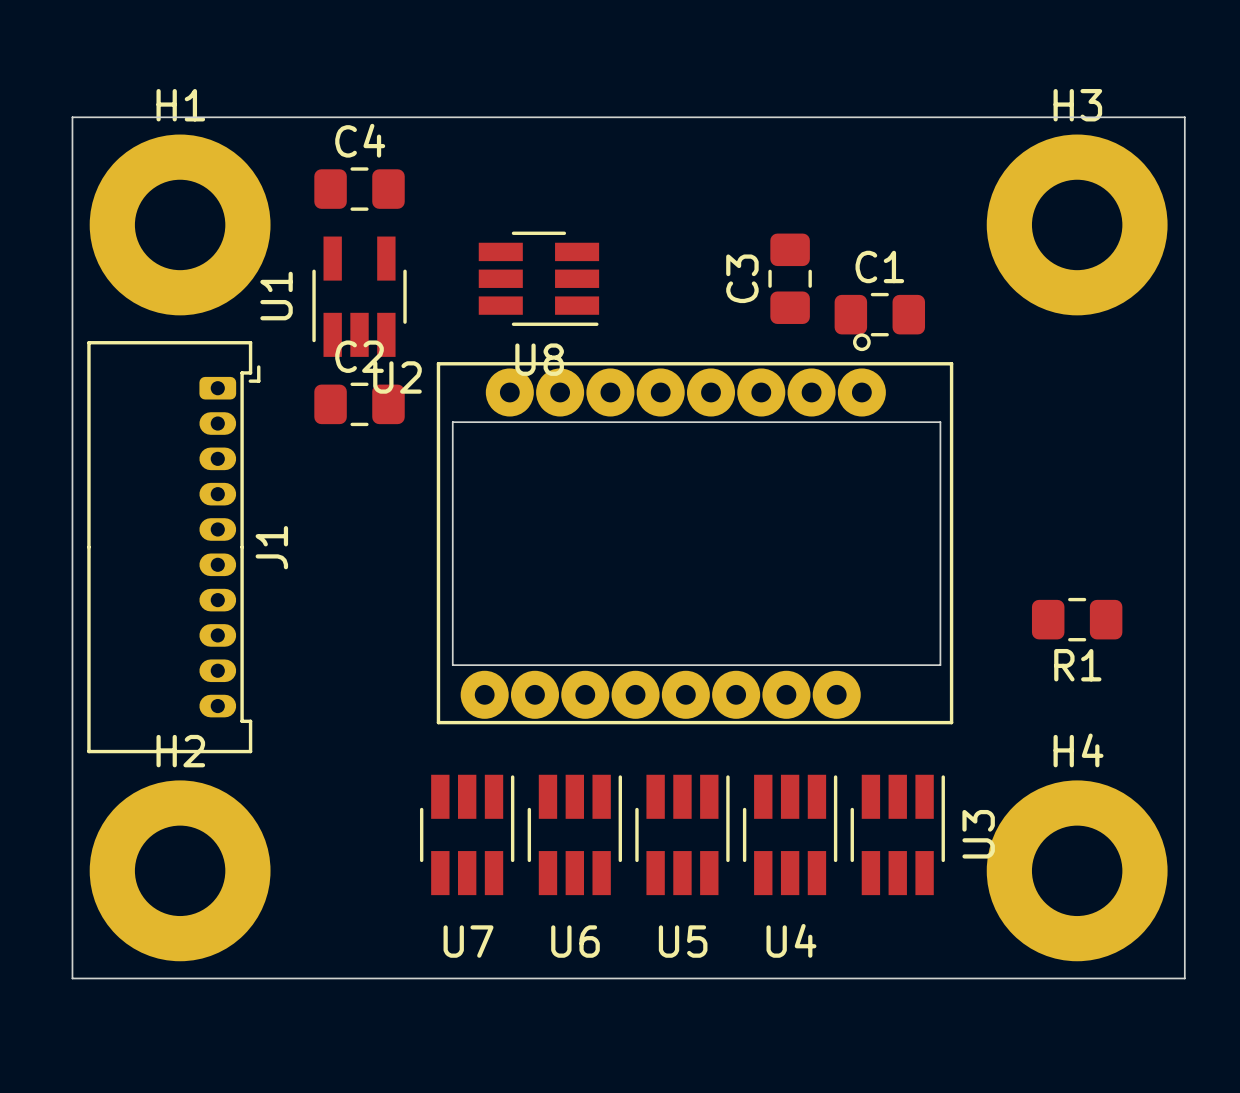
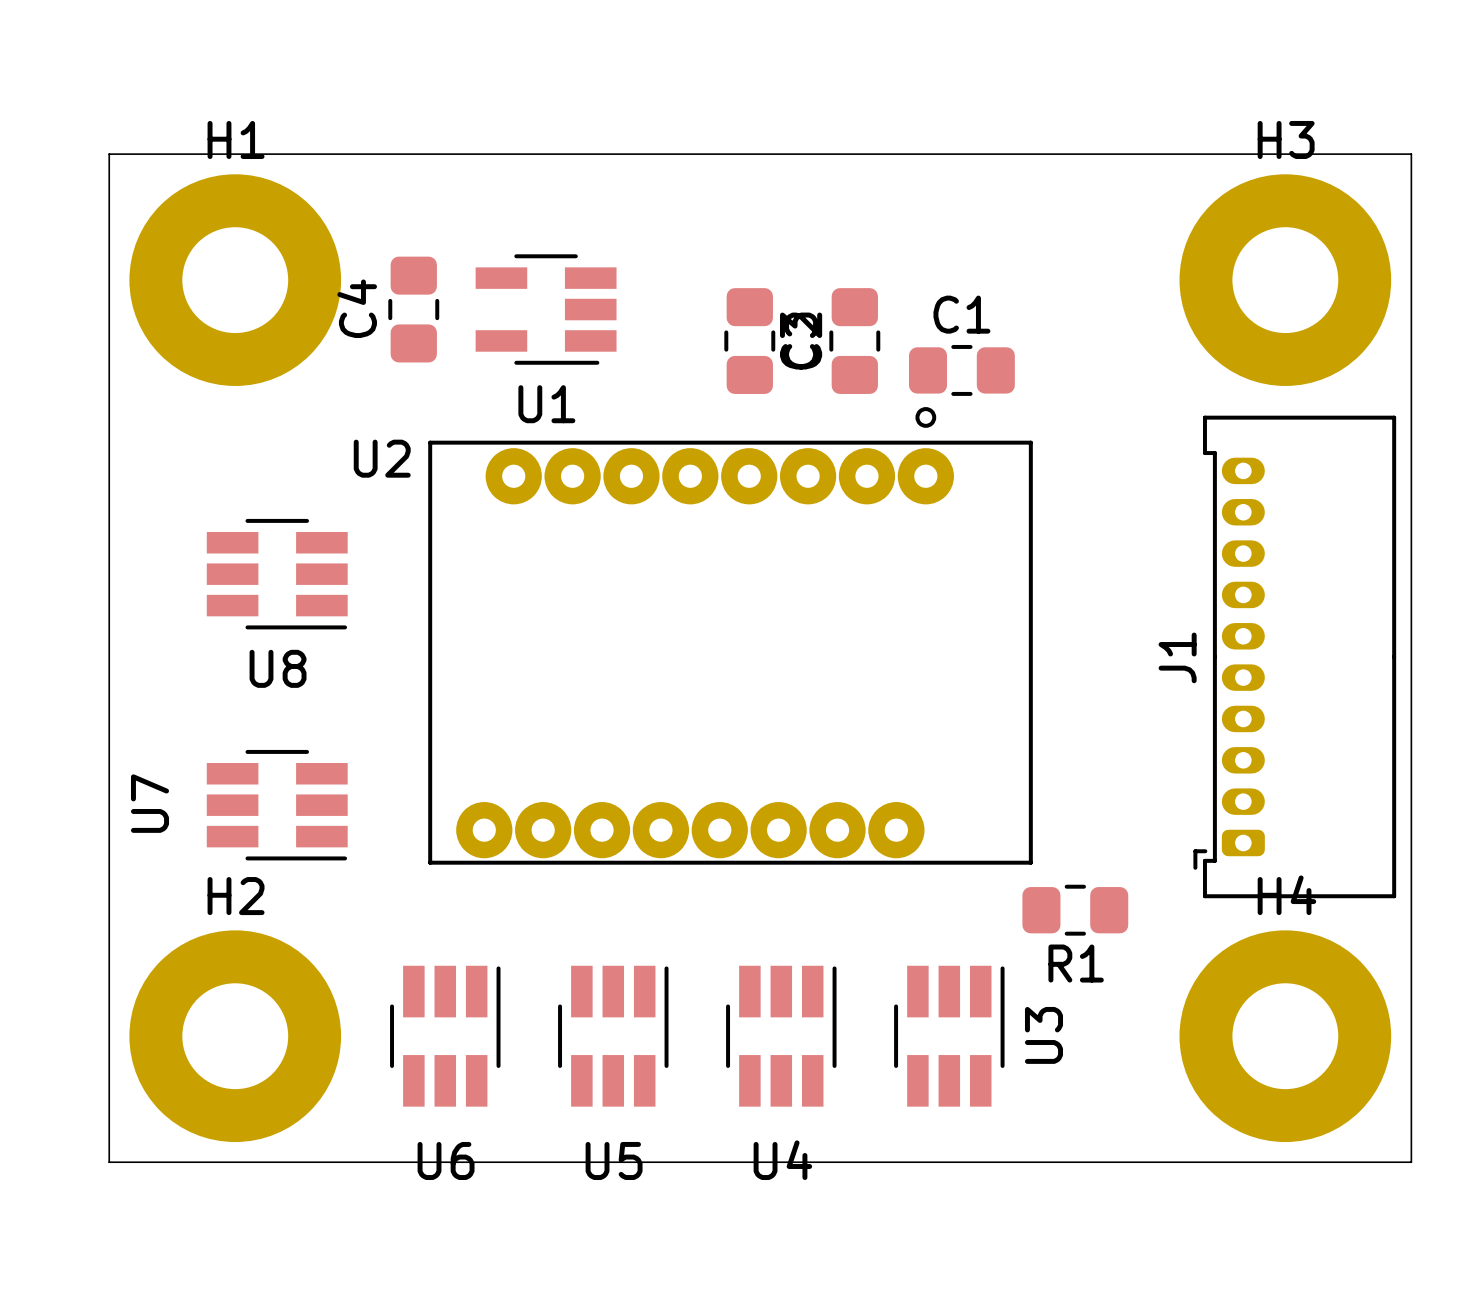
C4 name position: C4 (360, 140) -> C4 (357, 308)
C4 rotation: 0° (359, 189) -> 90° clockwise (413, 309)
C4 position: (359, 189) -> (413, 309)
U8 position: (538, 278) -> (277, 574)
C3 position: (790, 278) -> (854, 341)
U1 rotation: 0° (359, 296) -> 90° counterclockwise (546, 309)
U1 position: (359, 296) -> (546, 309)
C1 position: (879, 314) -> (961, 370)
U2 footprint: [436, 333, 954, 725] -> [428, 407, 1033, 865]
C2 rotation: 0° (359, 404) -> 90° clockwise (749, 341)
C2 position: (359, 404) -> (749, 341)
J1 rotation: 0° (173, 547) -> 180° (1294, 656)
J1 position: (173, 547) -> (1294, 656)
R1 position: (1077, 619) -> (1075, 910)
U7 rotation: 0° (467, 834) -> 90° clockwise (277, 805)
U7 position: (467, 834) -> (277, 805)
U6 position: (574, 834) -> (445, 1036)
U5 position: (682, 834) -> (613, 1036)
U4 position: (790, 834) -> (781, 1036)
U3 position: (897, 834) -> (949, 1036)

